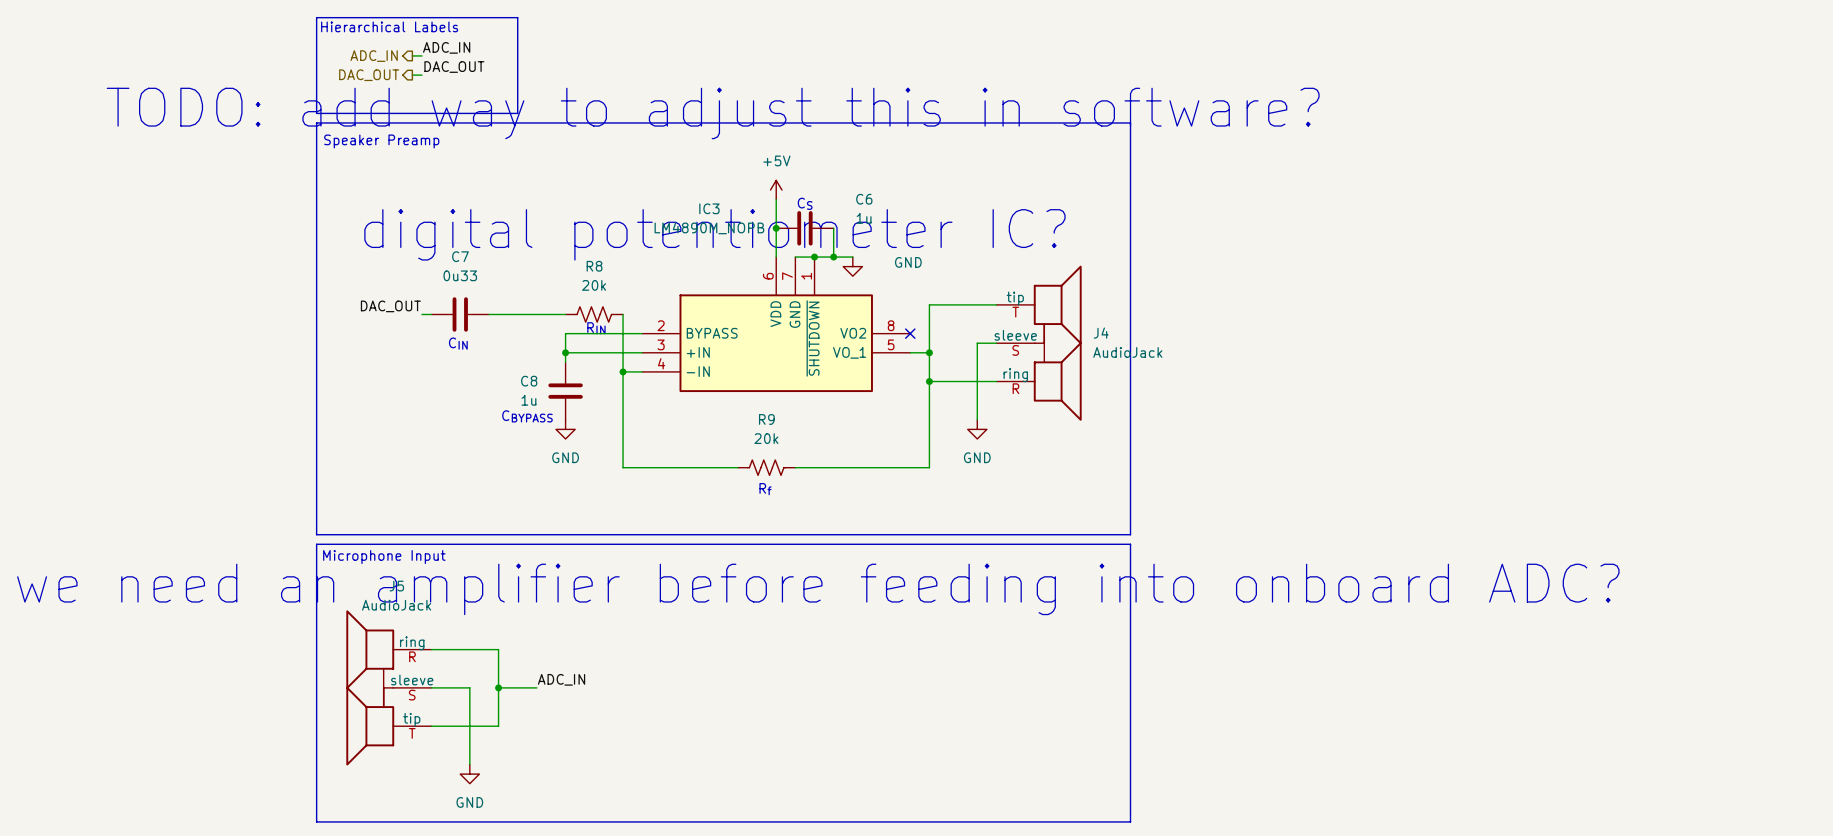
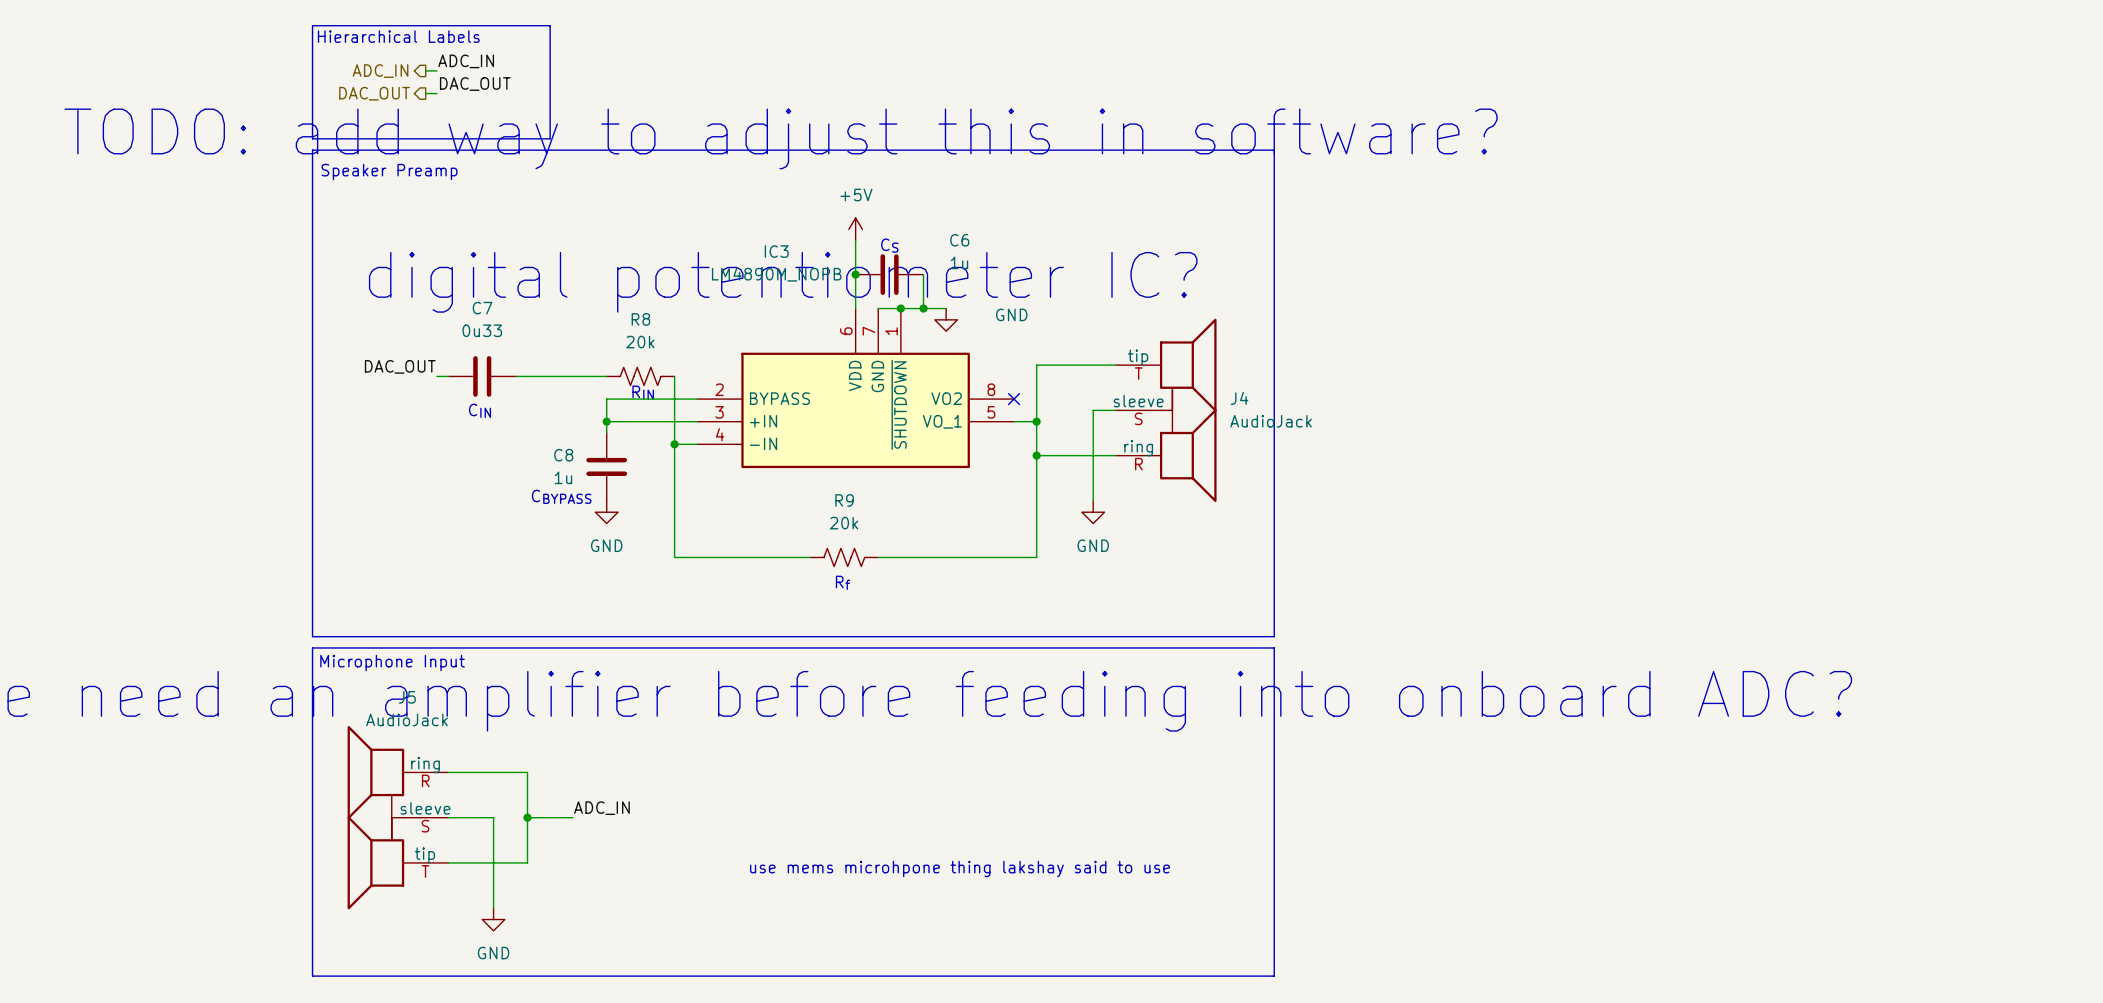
text: none -> use mems microhpone thing lakshay said to use (959, 868)

